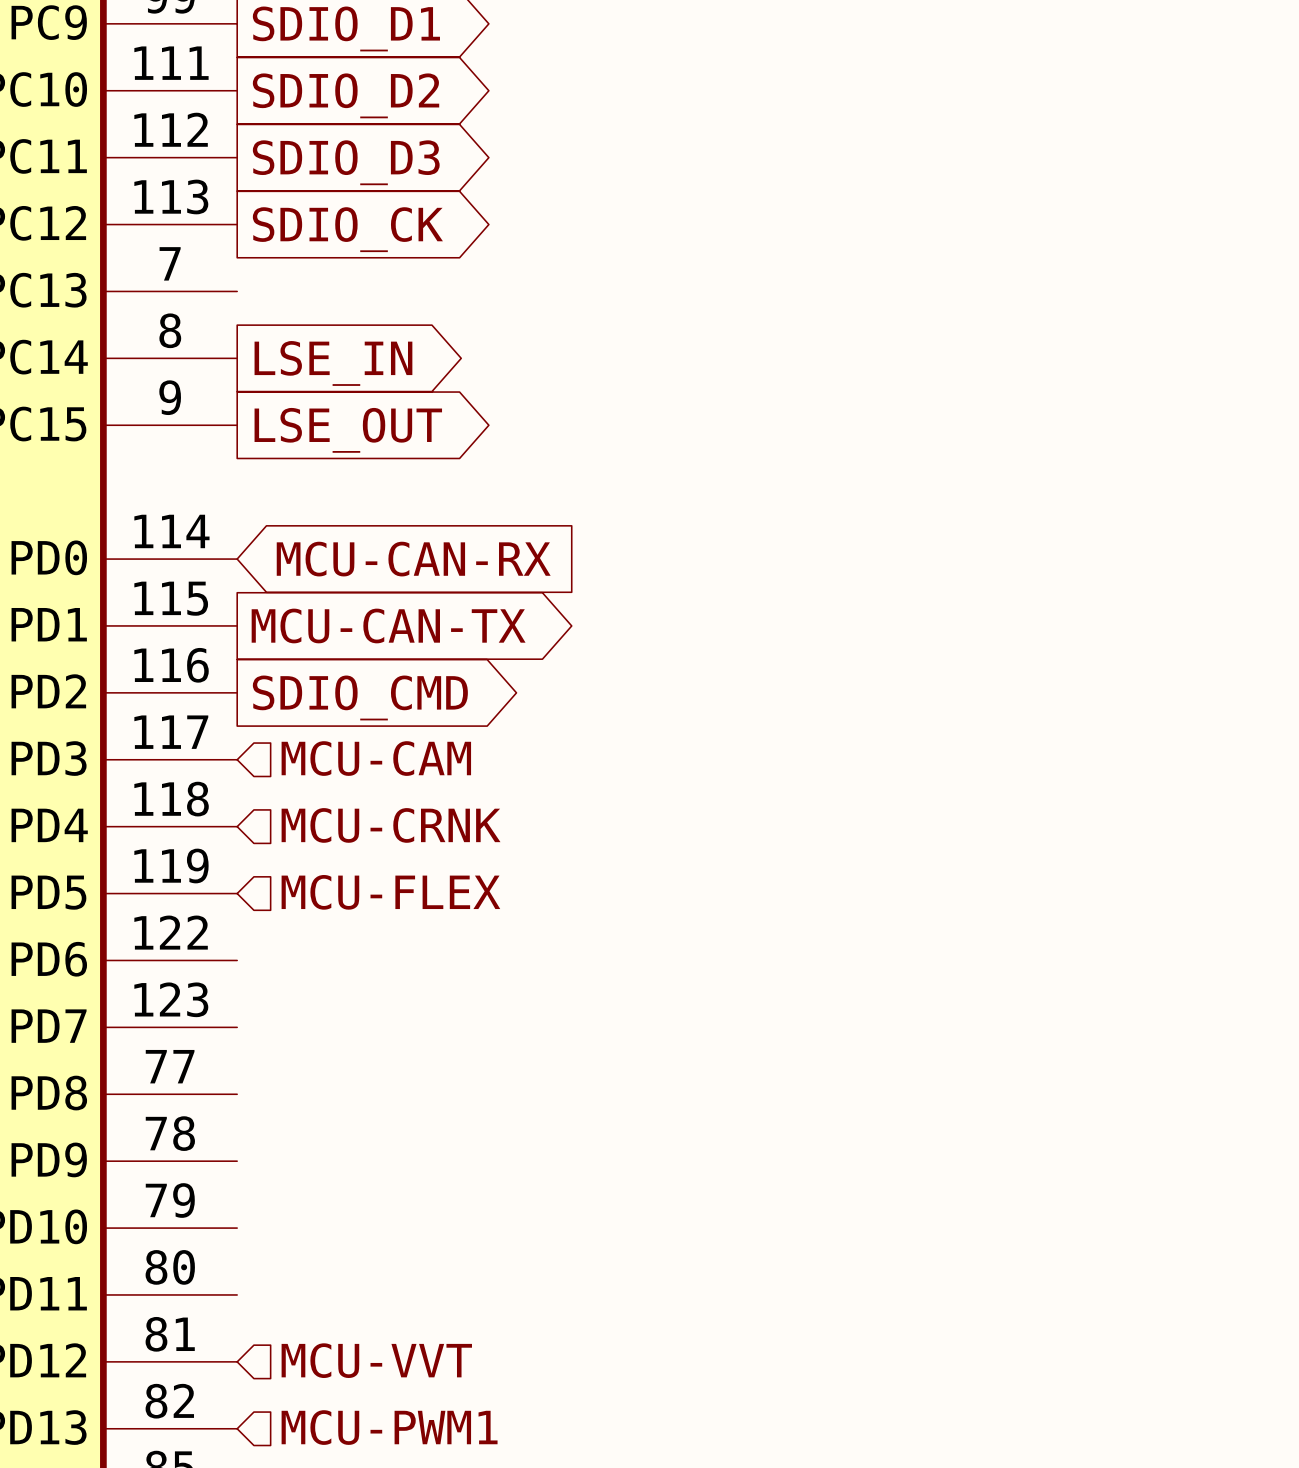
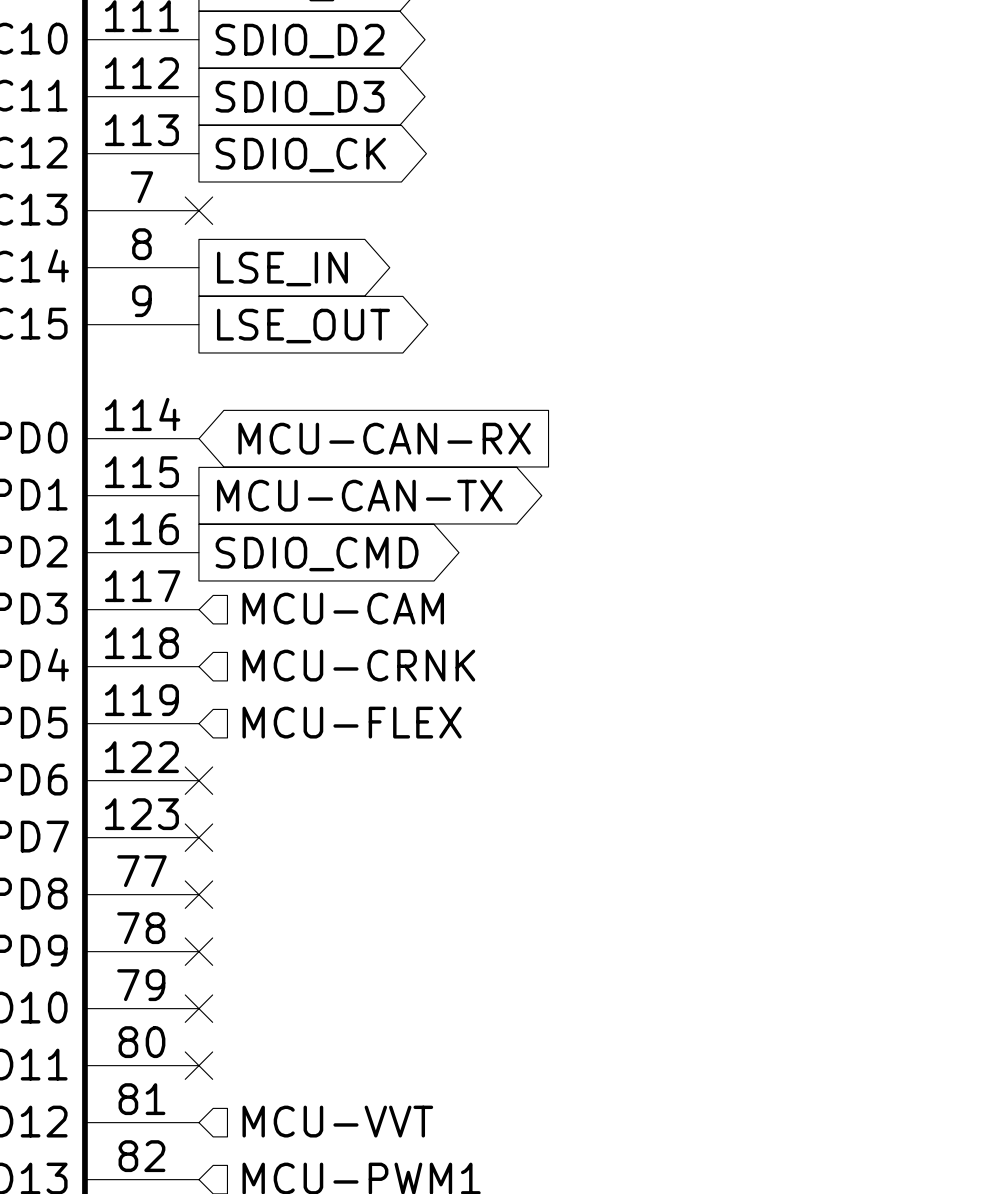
no-connect mark: none -> (198, 210)
no-connect mark: none -> (198, 780)
no-connect mark: none -> (198, 837)
no-connect mark: none -> (198, 894)
no-connect mark: none -> (198, 951)
no-connect mark: none -> (198, 1008)
no-connect mark: none -> (198, 1065)

